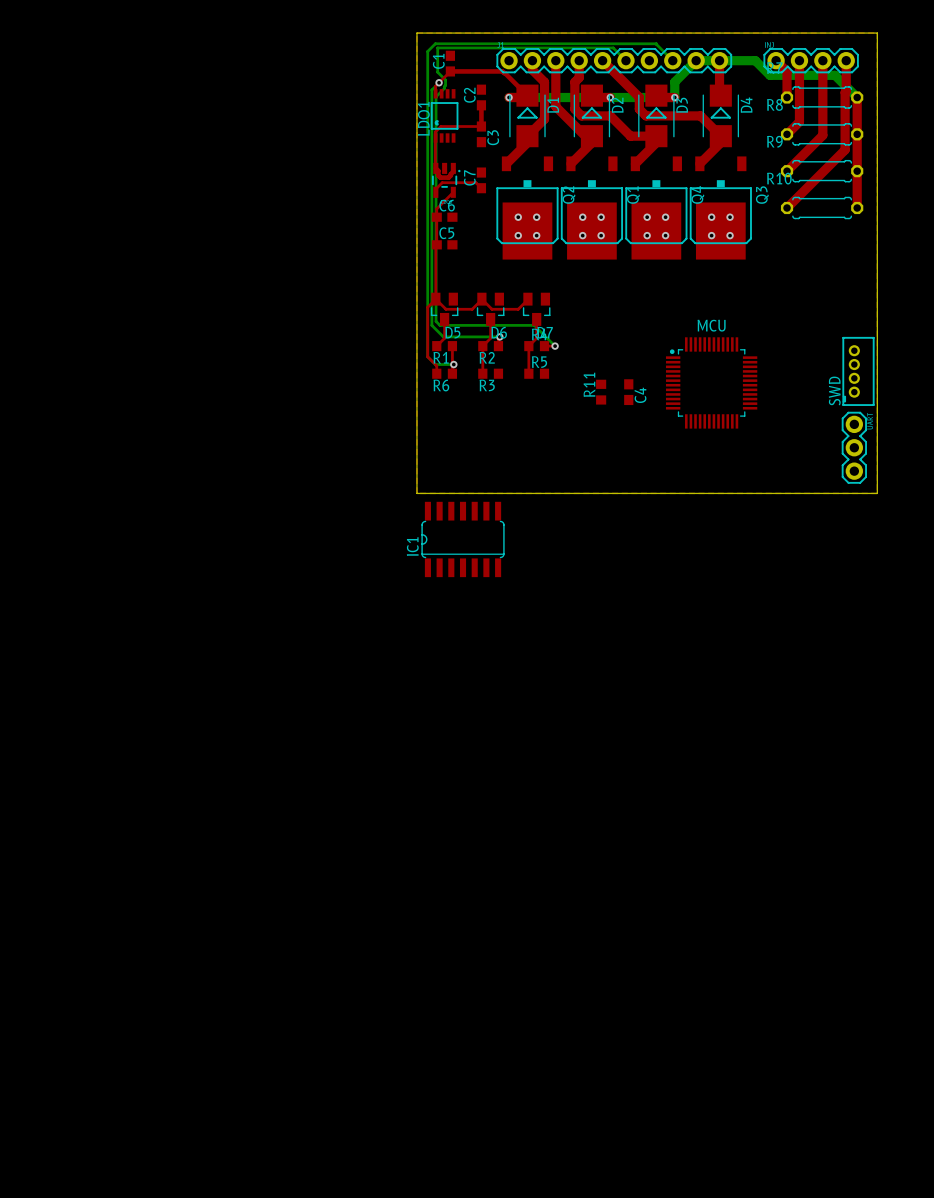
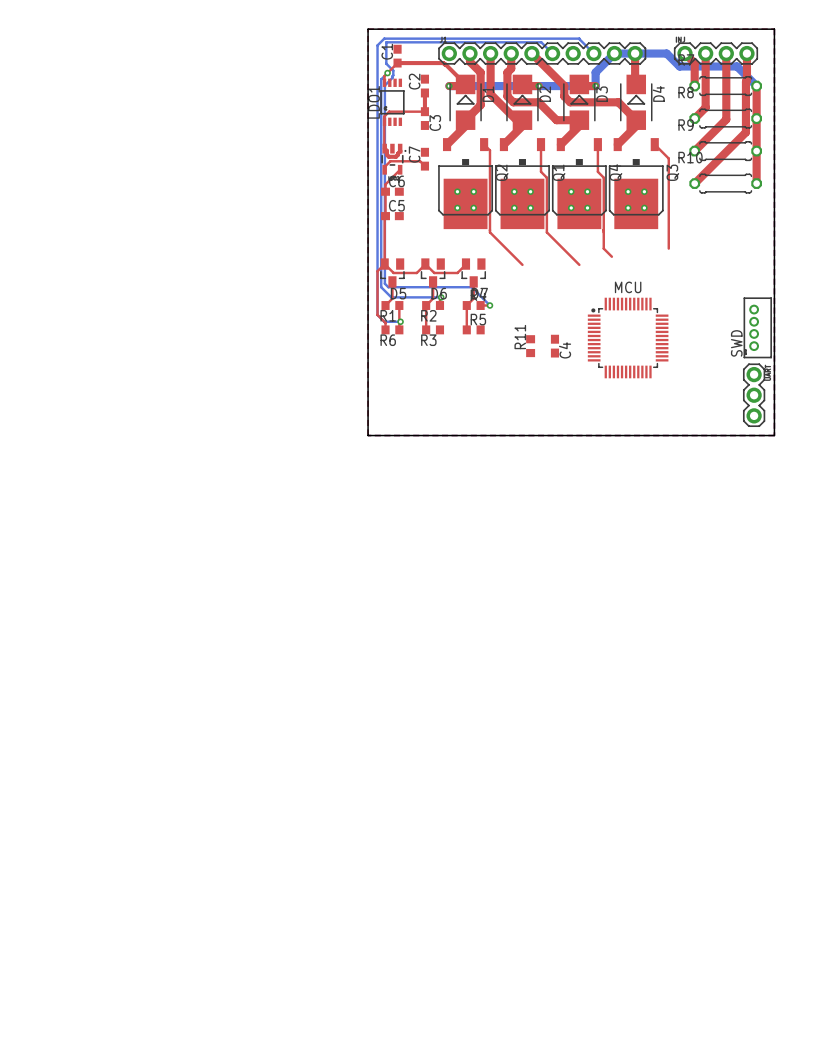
top track: none -> (484, 144) (489, 150) (489, 232) (522, 264)
top track: none -> (541, 144) (541, 171) (546, 177) (546, 232) (579, 264)
top track: none -> (597, 144) (597, 171) (603, 177) (603, 248) (611, 256)
top track: none -> (654, 144) (668, 158) (668, 248)
IC1: (463, 539) -> none

